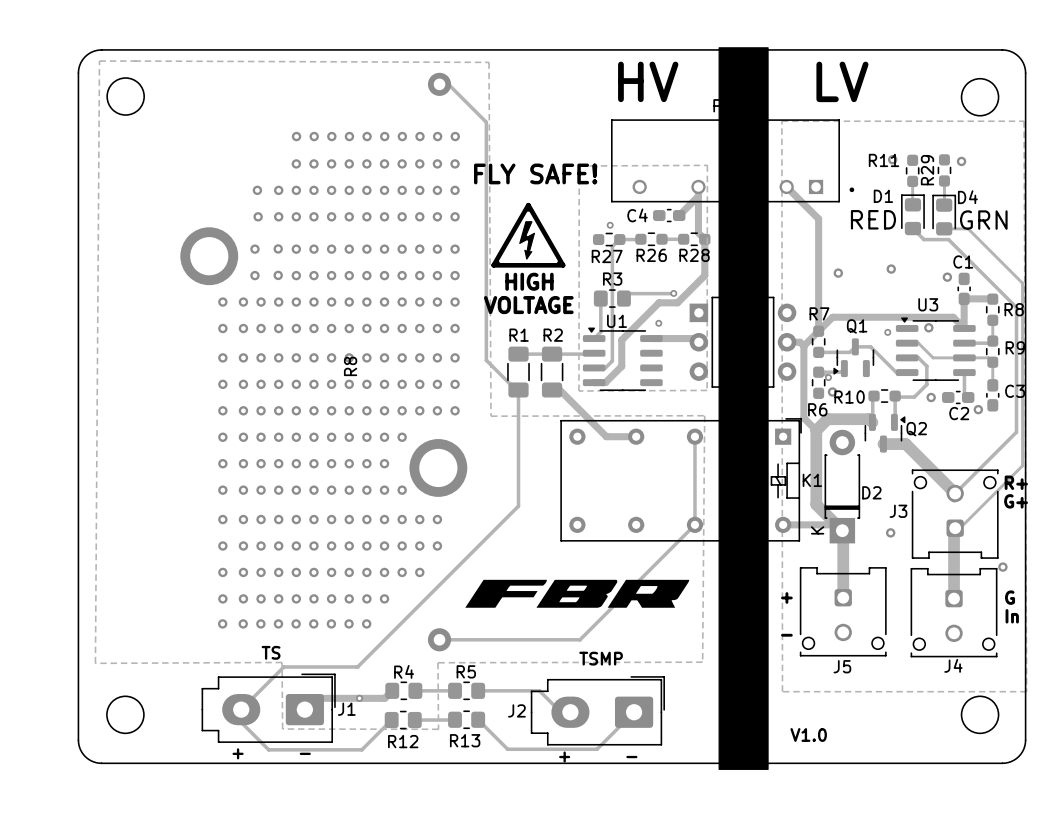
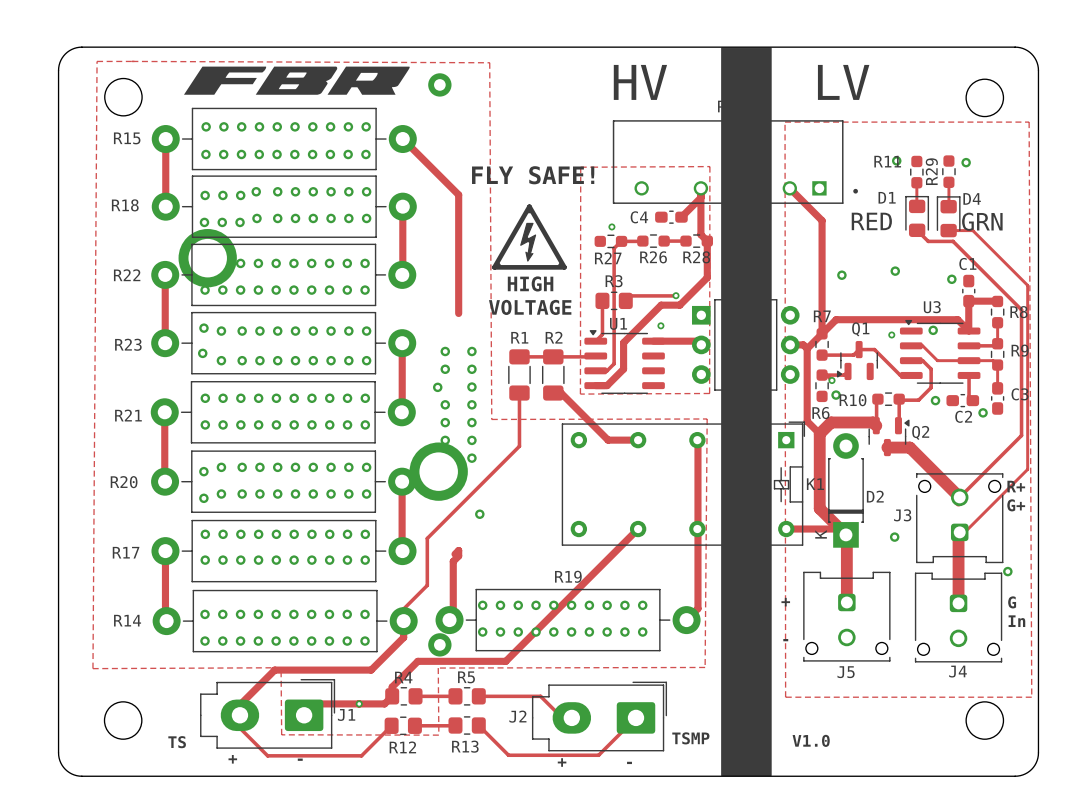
board edge: (101, 49) (1002, 49) (1016, 55) (1023, 63) (1025, 73) (1025, 740) (1020, 754) (1011, 761) (1002, 763) (101, 763) (87, 758) (80, 750) (78, 740) (78, 73) (79, 65) (85, 56) (91, 52) (101, 49) -> (81, 47) (74, 48) (65, 53) (60, 60) (58, 70) (58, 752) (60, 763) (67, 771) (81, 776) (1015, 776) (1025, 773) (1033, 767) (1038, 752) (1038, 70) (1036, 60) (1029, 52) (1015, 47) (81, 47)
drawing: none -> [183, 66, 410, 95]
track: (439, 84) (448, 84) (486, 122) (486, 360) (516, 389) (518, 389) -> none
via: none -> (206, 126)
via: none -> (223, 126)
via: none -> (241, 126)
via: none -> (259, 126)
via: none -> (277, 126)
via: none -> (295, 126)
via: none -> (312, 126)
via: none -> (330, 126)
via: none -> (348, 126)
via: none -> (366, 126)
via: (296, 136) -> none
via: (314, 136) -> none
via: (331, 136) -> none
via: (349, 136) -> none
via: (367, 136) -> none
via: (384, 136) -> none
via: (402, 136) -> none
via: (419, 136) -> none
via: (437, 136) -> none
via: (455, 136) -> none
track: none -> (165, 139) (165, 206)
R15: none -> (284, 139)
track: none -> (402, 139) (458, 194) (458, 313)
via: none -> (205, 154)
via: none -> (223, 154)
via: none -> (241, 154)
via: none -> (259, 154)
via: none -> (277, 154)
via: none -> (294, 154)
via: none -> (312, 154)
via: none -> (330, 154)
via: none -> (348, 154)
via: none -> (365, 154)
via: (296, 163) -> none
via: (313, 163) -> none
via: (331, 163) -> none
via: (349, 163) -> none
via: (366, 163) -> none
via: (384, 163) -> none
via: (402, 163) -> none
via: (419, 163) -> none
via: (437, 163) -> none
via: (455, 163) -> none
via: (384, 190) -> none
via: (402, 190) -> none
via: (419, 190) -> none
via: (437, 190) -> none
via: (455, 190) -> none
via: none -> (205, 195)
via: none -> (222, 195)
via: none -> (240, 195)
R18: none -> (284, 206)
track: none -> (402, 206) (402, 274)
via: (384, 216) -> none
via: (402, 216) -> none
via: (419, 216) -> none
via: (437, 216) -> none
via: (455, 216) -> none
via: none -> (204, 222)
via: none -> (222, 222)
via: none -> (240, 222)
via: (278, 248) -> none
via: (254, 249) -> none
via: (296, 249) -> none
via: (313, 249) -> none
via: (331, 249) -> none
via: (349, 249) -> none
via: (366, 249) -> none
via: (384, 249) -> none
via: (402, 249) -> none
via: (419, 249) -> none
via: (437, 249) -> none
via: (455, 249) -> none
via: none -> (240, 263)
via: none -> (258, 263)
via: none -> (276, 263)
via: none -> (293, 263)
via: none -> (311, 263)
via: none -> (329, 263)
via: none -> (347, 263)
via: none -> (365, 263)
track: none -> (165, 274) (165, 343)
R22: none -> (283, 274)
via: (254, 275) -> none
via: (278, 275) -> none
via: (296, 275) -> none
via: (313, 275) -> none
via: (331, 275) -> none
via: (349, 275) -> none
via: (366, 275) -> none
via: (384, 275) -> none
via: (402, 275) -> none
via: (419, 275) -> none
via: (437, 275) -> none
via: (455, 275) -> none
via: none -> (205, 290)
via: none -> (222, 290)
via: none -> (240, 290)
via: none -> (258, 290)
via: none -> (276, 290)
via: none -> (293, 290)
via: none -> (311, 290)
via: none -> (329, 290)
via: none -> (347, 290)
via: none -> (365, 290)
via: (222, 302) -> none
via: (243, 302) -> none
via: (261, 302) -> none
via: (278, 302) -> none
via: (296, 302) -> none
via: (313, 302) -> none
via: (331, 302) -> none
via: (349, 302) -> none
via: (366, 302) -> none
via: (384, 302) -> none
via: (402, 302) -> none
via: (419, 302) -> none
via: (437, 302) -> none
via: (455, 302) -> none
via: none -> (203, 328)
via: (384, 328) -> none
via: (402, 328) -> none
via: (419, 328) -> none
via: (437, 328) -> none
via: (455, 328) -> none
R23: none -> (283, 343)
track: none -> (402, 343) (401, 412)
via: none -> (445, 351)
via: none -> (471, 351)
via: none -> (202, 353)
via: (384, 357) -> none
via: (402, 357) -> none
via: (419, 357) -> none
via: (437, 357) -> none
via: (455, 357) -> none
text: R8 (350, 366) -> none
via: none -> (445, 369)
via: none -> (471, 369)
via: (222, 384) -> none
via: (243, 384) -> none
via: (261, 384) -> none
via: (278, 384) -> none
via: (296, 384) -> none
via: (313, 384) -> none
via: (331, 384) -> none
via: (349, 384) -> none
via: (366, 384) -> none
via: (384, 384) -> none
via: (402, 384) -> none
via: (419, 384) -> none
via: (455, 384) -> none
via: none -> (471, 387)
via: none -> (205, 398)
via: none -> (223, 398)
via: none -> (240, 398)
via: none -> (258, 398)
via: none -> (276, 398)
via: none -> (294, 398)
via: none -> (311, 398)
via: none -> (329, 398)
via: none -> (347, 398)
via: none -> (365, 398)
via: none -> (445, 404)
via: none -> (471, 404)
track: none -> (164, 412) (165, 481)
R21: none -> (283, 412)
via: (222, 410) -> none
via: (243, 410) -> none
via: (261, 410) -> none
via: (278, 410) -> none
via: (296, 410) -> none
via: (313, 410) -> none
via: (331, 410) -> none
via: (349, 410) -> none
via: (366, 410) -> none
via: (384, 410) -> none
via: (402, 410) -> none
via: (419, 410) -> none
via: (437, 410) -> none
via: (455, 410) -> none
via: none -> (445, 422)
via: none -> (471, 422)
via: none -> (205, 424)
via: none -> (223, 424)
via: none -> (240, 424)
via: none -> (258, 424)
via: none -> (276, 424)
via: none -> (294, 424)
via: none -> (311, 424)
via: none -> (329, 424)
via: none -> (347, 424)
via: none -> (365, 424)
via: none -> (445, 440)
via: none -> (471, 440)
via: (222, 437) -> none
via: (243, 437) -> none
via: (261, 437) -> none
via: (278, 437) -> none
via: (296, 437) -> none
via: (313, 437) -> none
via: (331, 437) -> none
via: (349, 437) -> none
via: (366, 437) -> none
via: (384, 437) -> none
via: (402, 437) -> none
track: (518, 442) (518, 506) (357, 666) (283, 666) (241, 709) -> (519, 446) (427, 538) (427, 585) (403, 609) (403, 637) (371, 670) (274, 670) (239, 704)
track: none -> (697, 445) (697, 608) (686, 620)
via: none -> (471, 458)
via: (384, 463) -> none
via: none -> (203, 471)
R20: none -> (283, 481)
track: none -> (402, 481) (402, 551)
via: (384, 490) -> none
via: (402, 490) -> none
via: none -> (203, 498)
via: none -> (479, 514)
via: (222, 519) -> none
via: (243, 519) -> none
via: (261, 519) -> none
via: (278, 519) -> none
via: (296, 519) -> none
via: (313, 519) -> none
via: (331, 519) -> none
via: (349, 519) -> none
via: (366, 519) -> none
via: (384, 519) -> none
via: (402, 519) -> none
via: (419, 519) -> none
via: (437, 519) -> none
track: none -> (638, 529) (505, 661) (417, 661) (392, 687) (392, 696)
track: (694, 524) (580, 639) (439, 639) -> none
via: none -> (205, 534)
via: none -> (223, 534)
via: none -> (240, 534)
via: none -> (258, 534)
via: none -> (276, 534)
via: none -> (294, 534)
via: none -> (311, 534)
via: none -> (329, 534)
via: none -> (347, 534)
via: none -> (365, 534)
via: (222, 545) -> none
via: (243, 545) -> none
via: (261, 545) -> none
via: (278, 545) -> none
via: (296, 545) -> none
via: (313, 545) -> none
via: (331, 545) -> none
via: (349, 545) -> none
via: (366, 545) -> none
via: (384, 545) -> none
via: (402, 545) -> none
via: (419, 545) -> none
via: (437, 545) -> none
track: none -> (165, 551) (166, 621)
R17: none -> (283, 551)
track: none -> (455, 554) (458, 550) (458, 556) (453, 561) (453, 616) (449, 620)
via: none -> (205, 560)
via: none -> (223, 560)
via: none -> (240, 560)
via: none -> (258, 560)
via: none -> (276, 560)
via: none -> (294, 560)
via: none -> (311, 560)
via: none -> (329, 560)
via: none -> (347, 560)
via: none -> (365, 560)
via: (222, 572) -> none
via: (243, 572) -> none
via: (261, 572) -> none
via: (278, 572) -> none
via: (296, 572) -> none
via: (313, 572) -> none
via: (331, 572) -> none
via: (349, 572) -> none
via: (366, 572) -> none
via: (384, 572) -> none
via: (402, 572) -> none
via: (419, 572) -> none
drawing: [465, 579, 690, 608] -> none
via: (222, 598) -> none
via: (243, 598) -> none
via: (261, 598) -> none
via: (278, 598) -> none
via: (296, 598) -> none
via: (313, 598) -> none
via: (331, 598) -> none
via: (349, 598) -> none
via: (366, 598) -> none
via: (384, 598) -> none
via: none -> (482, 605)
via: none -> (500, 605)
via: none -> (518, 605)
via: none -> (536, 605)
via: none -> (553, 605)
via: none -> (571, 605)
via: none -> (589, 605)
via: none -> (607, 605)
via: none -> (624, 605)
via: none -> (642, 605)
via: none -> (205, 614)
via: none -> (222, 614)
via: none -> (240, 614)
via: none -> (258, 614)
via: none -> (276, 614)
via: none -> (293, 614)
via: none -> (311, 614)
via: none -> (329, 614)
via: none -> (347, 614)
via: none -> (365, 614)
R19: none -> (568, 620)
R14: none -> (285, 621)
via: (222, 623) -> none
via: (243, 623) -> none
via: (260, 623) -> none
via: (278, 623) -> none
via: (296, 623) -> none
via: (313, 623) -> none
via: (331, 623) -> none
via: (349, 623) -> none
via: (366, 623) -> none
via: none -> (482, 632)
via: none -> (500, 632)
via: none -> (518, 632)
via: none -> (536, 632)
via: none -> (553, 632)
via: none -> (571, 632)
via: none -> (589, 632)
via: none -> (607, 632)
via: none -> (624, 632)
via: none -> (642, 632)
via: none -> (205, 641)
via: none -> (222, 641)
via: none -> (240, 641)
via: none -> (258, 641)
via: none -> (276, 641)
via: none -> (293, 641)
via: none -> (311, 641)
via: none -> (329, 641)
via: none -> (347, 641)
via: none -> (365, 641)
text position: TS (271, 652) -> TS (177, 742)
text position: TSMP (601, 658) -> TSMP (690, 738)

